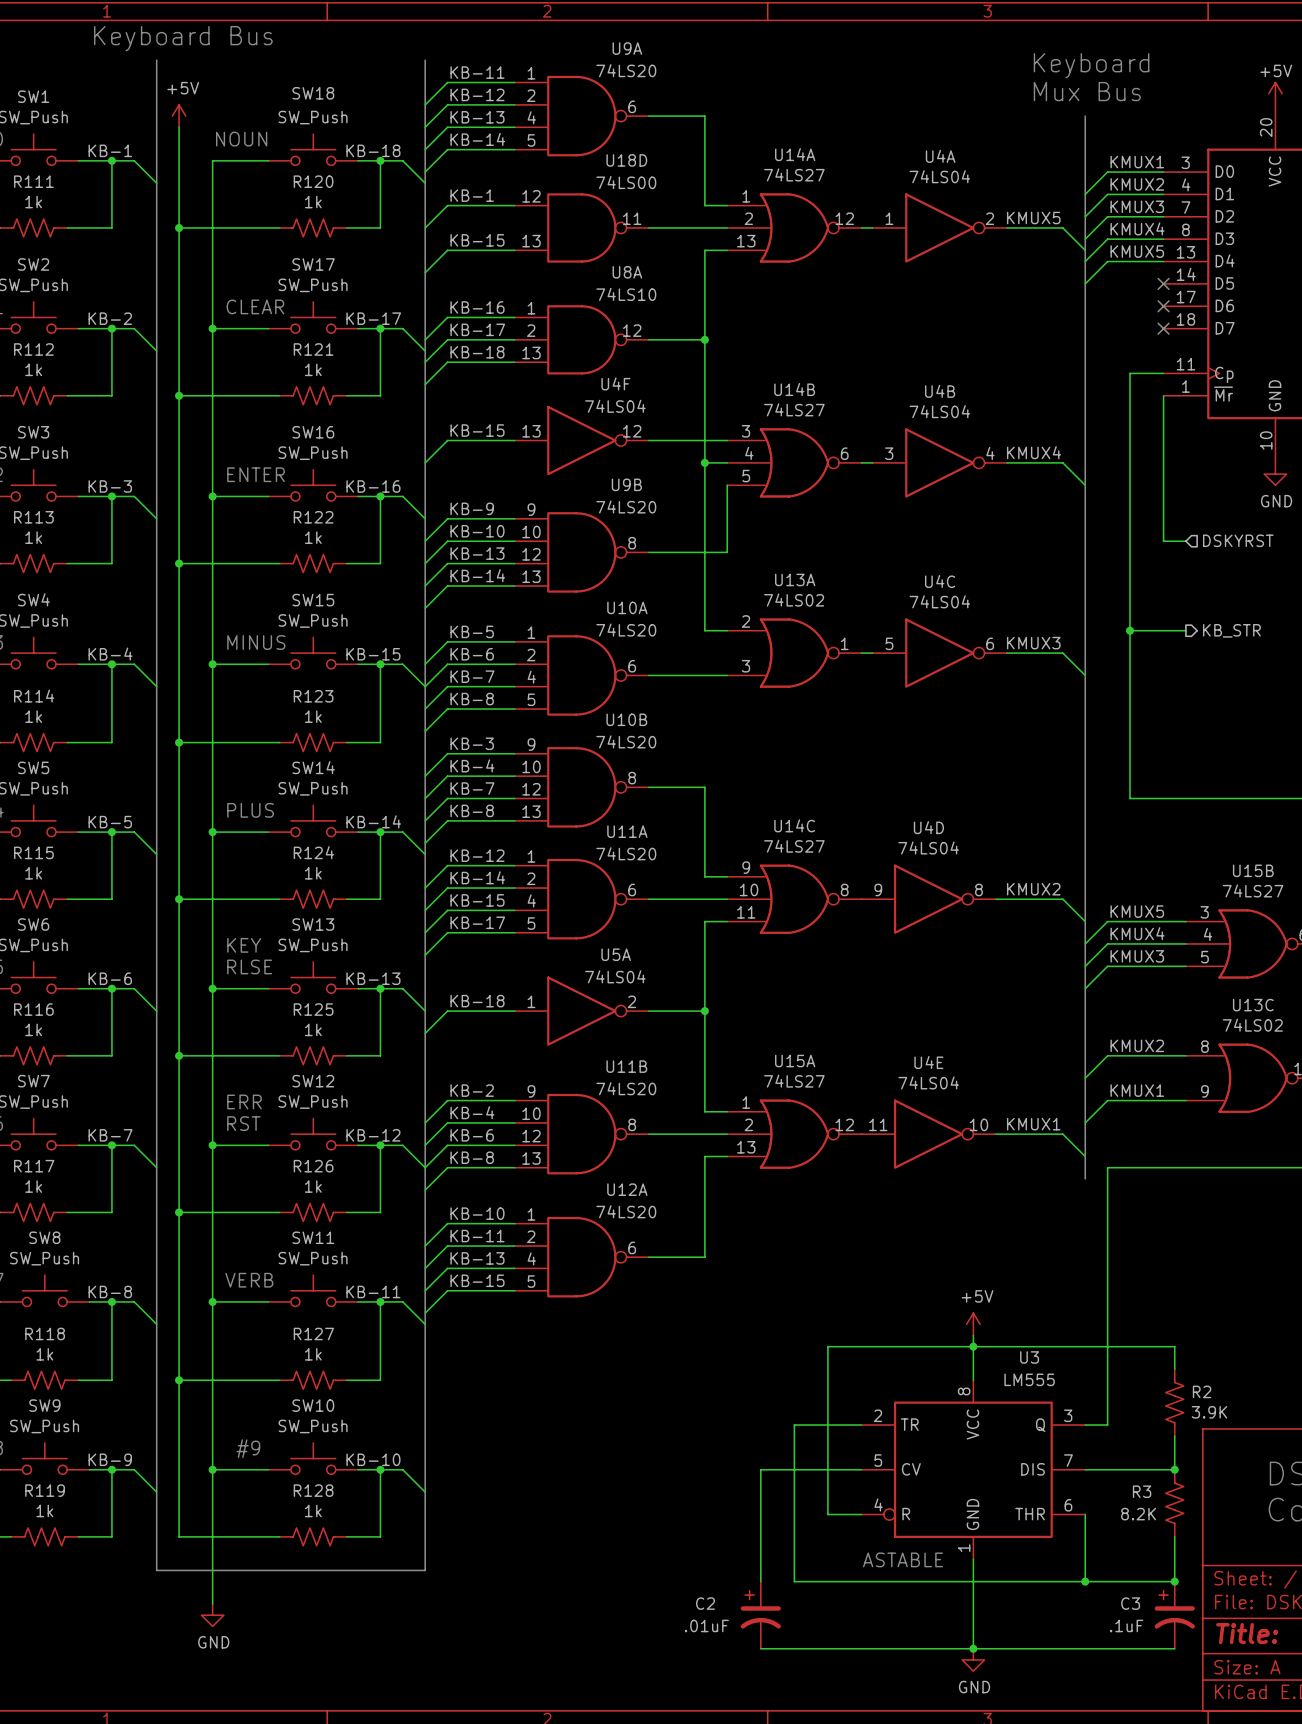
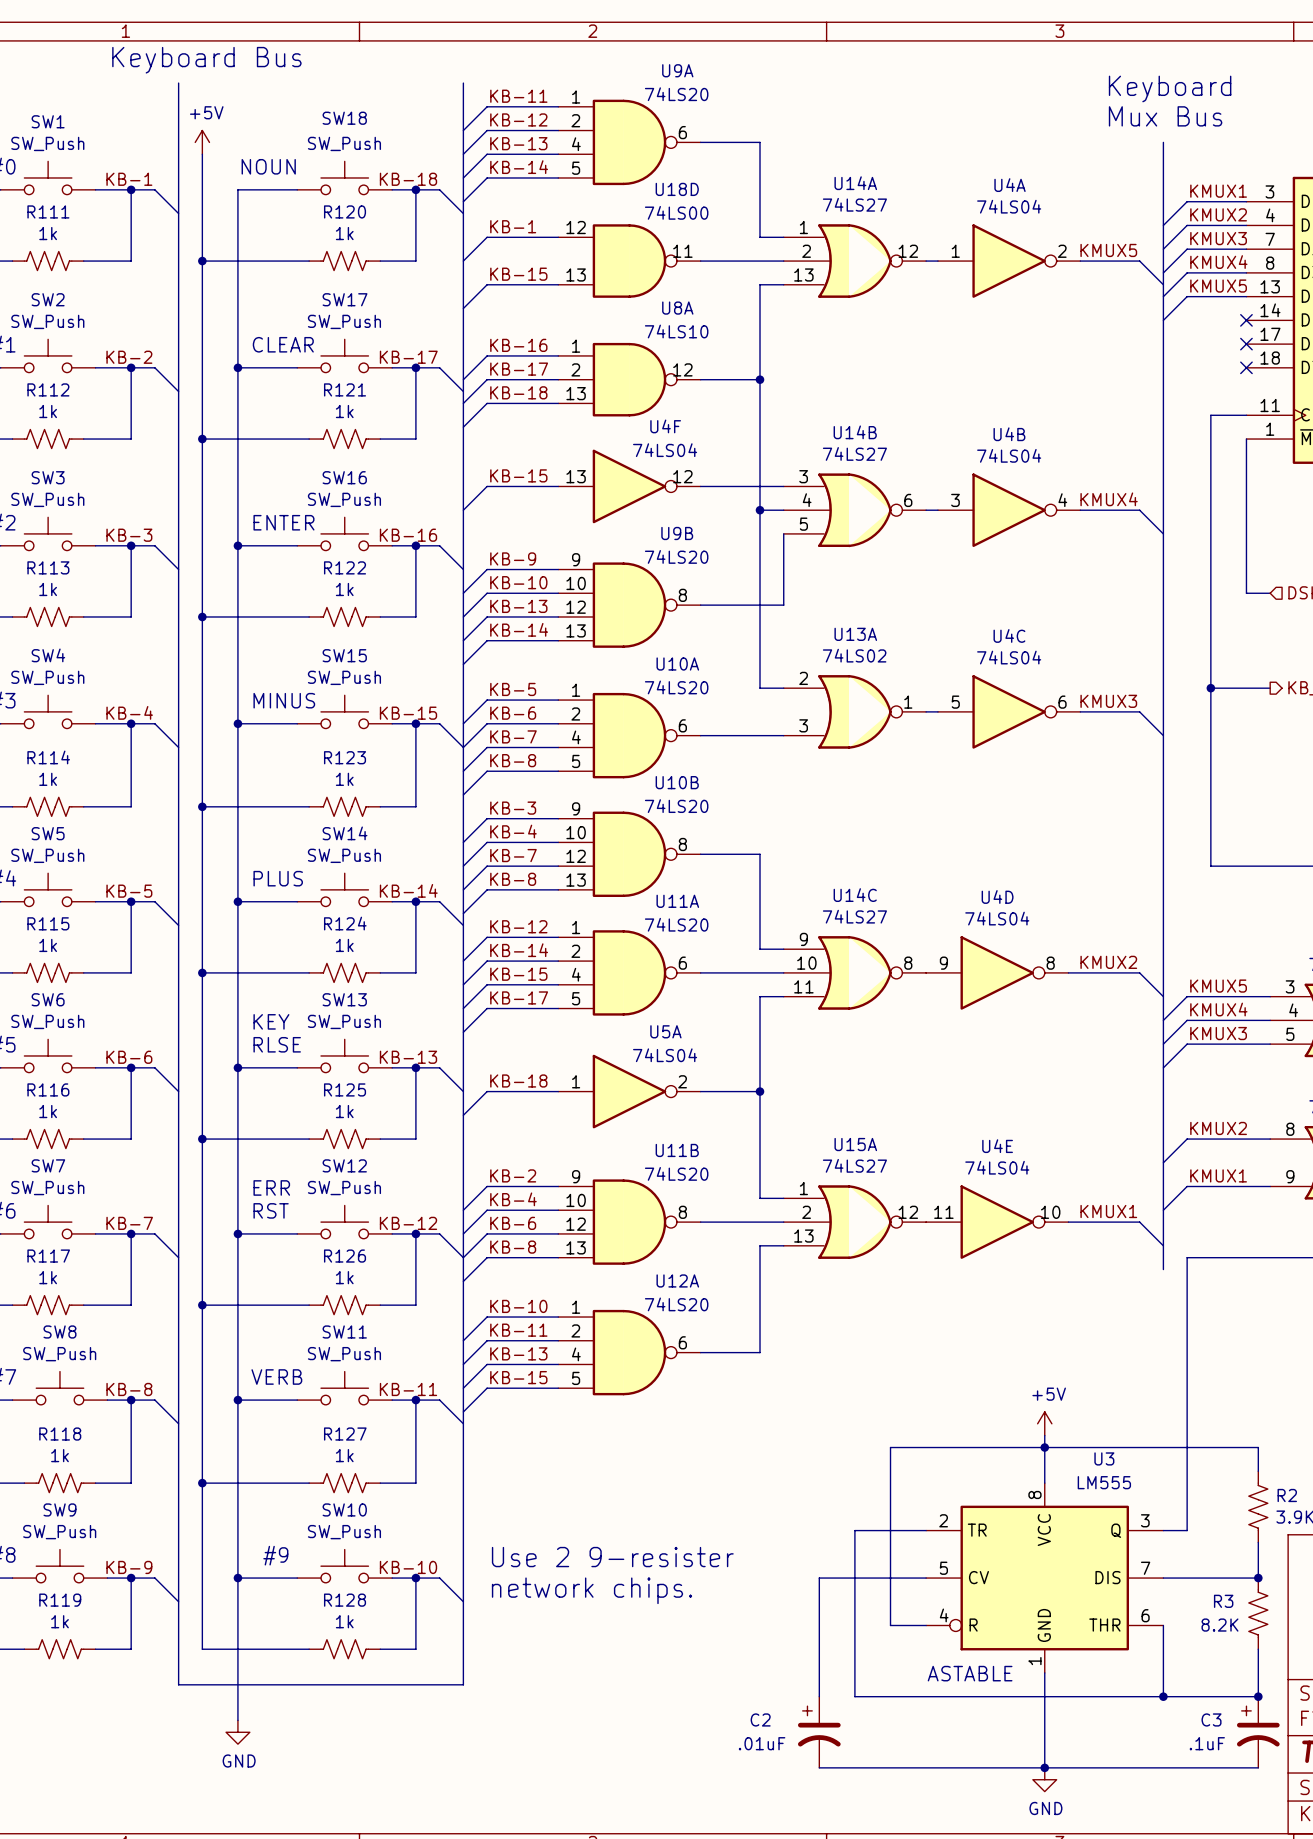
text: none -> Use 2 9-resister (612, 1557)
text: none -> network chips. (592, 1590)

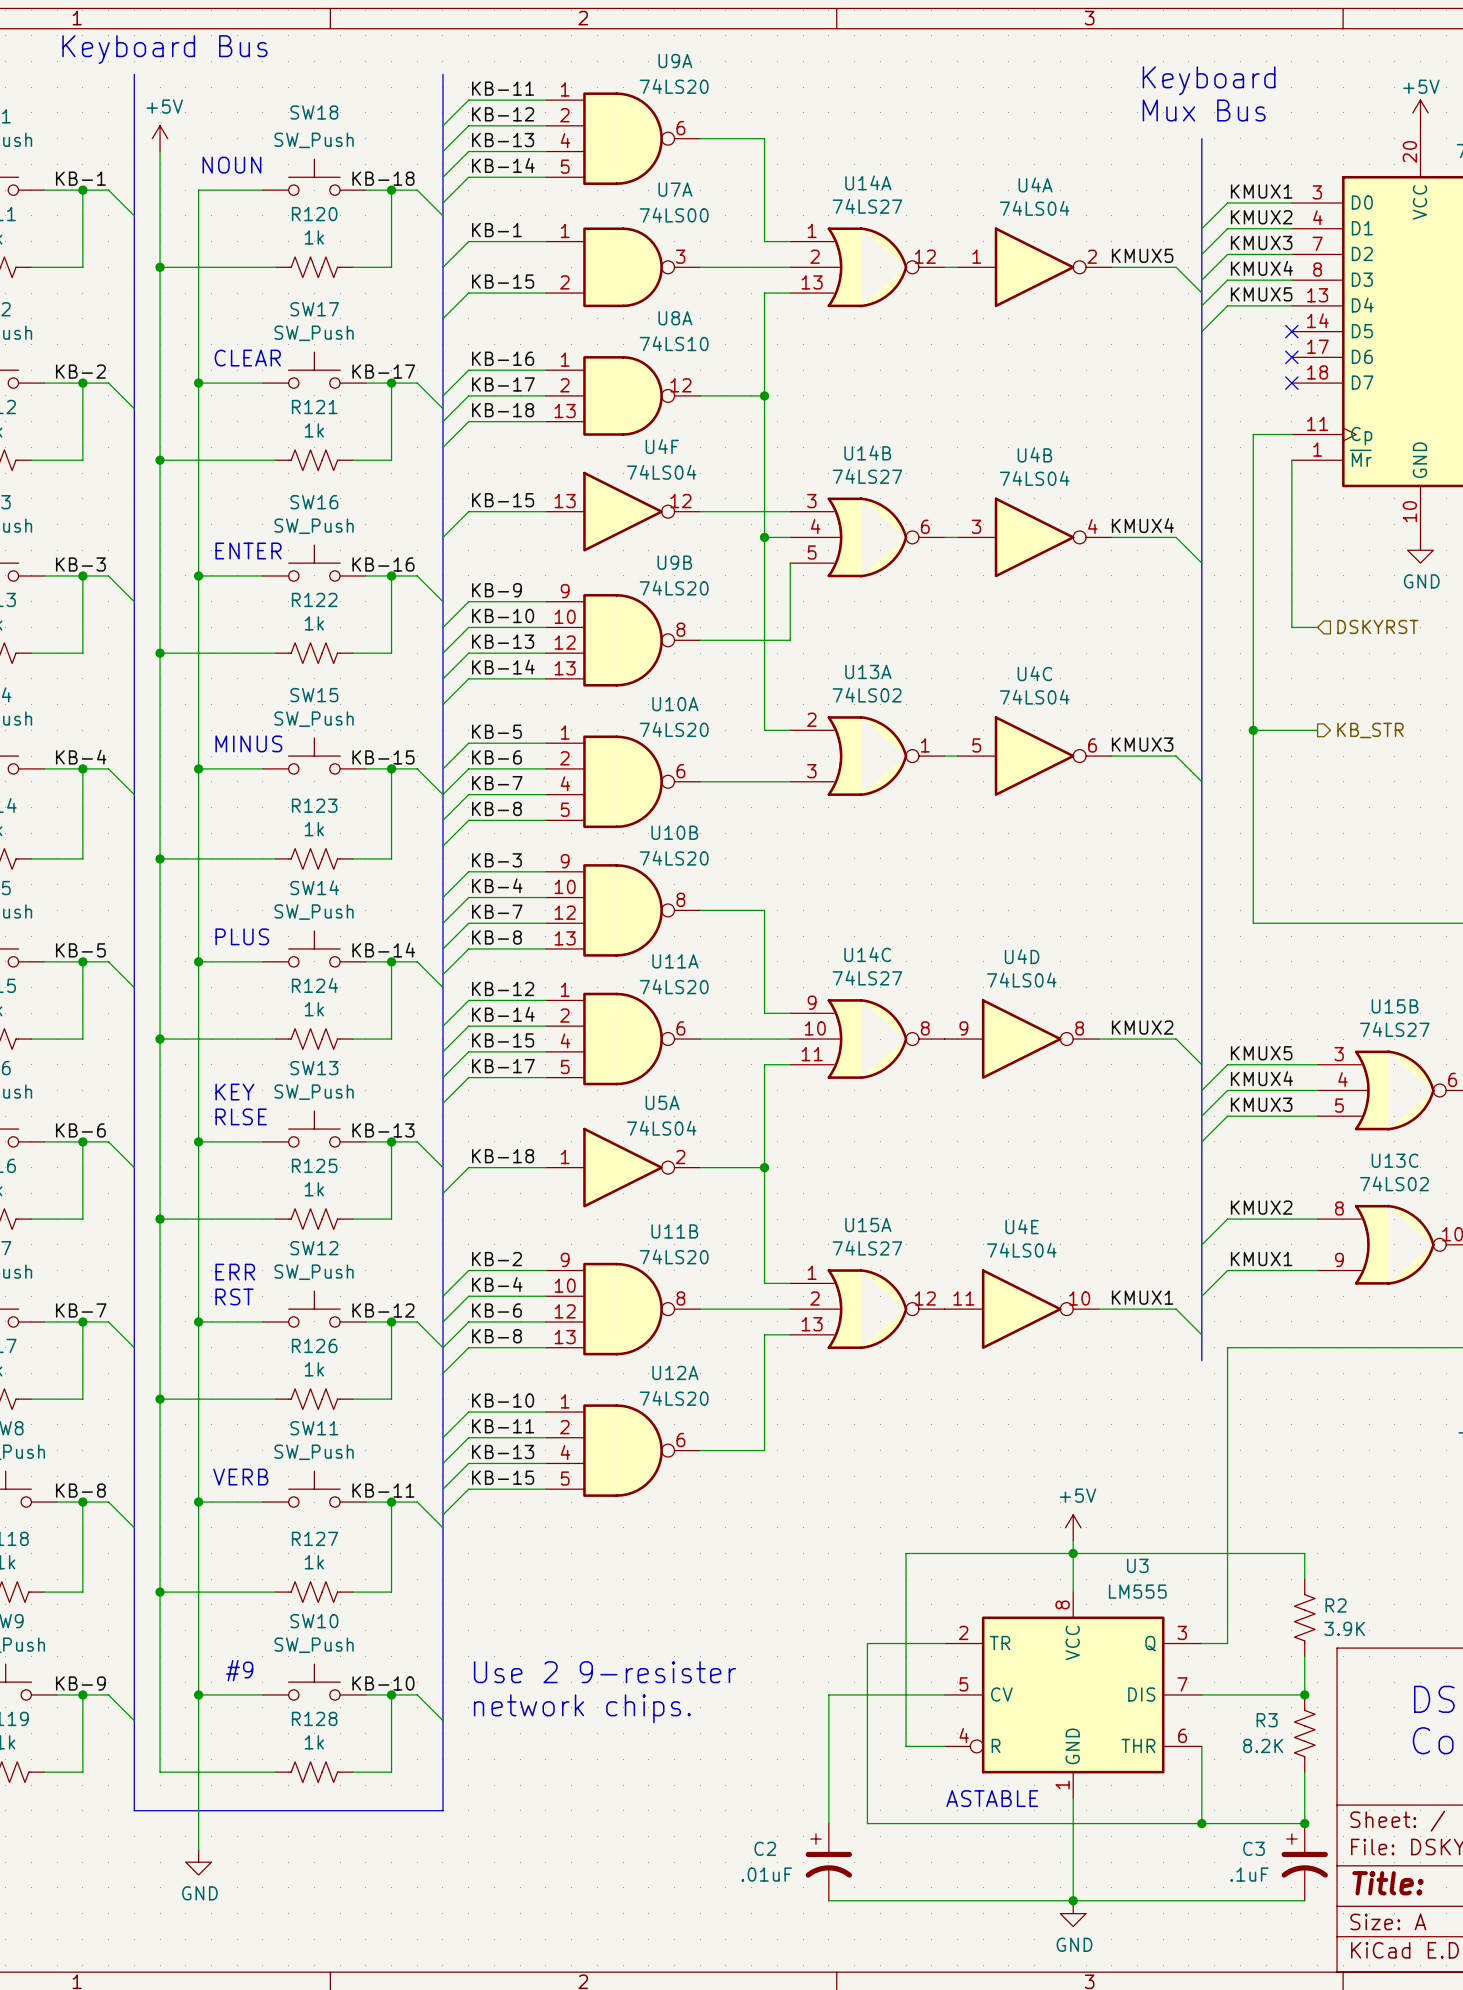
U18D name: U18D (677, 189) -> U7A (675, 189)
U18D pin number: 12 (576, 227) -> 1 (565, 230)
U18D pin number: 11 (682, 251) -> 3 (680, 256)
U18D pin number: 13 (576, 274) -> 2 (564, 282)

